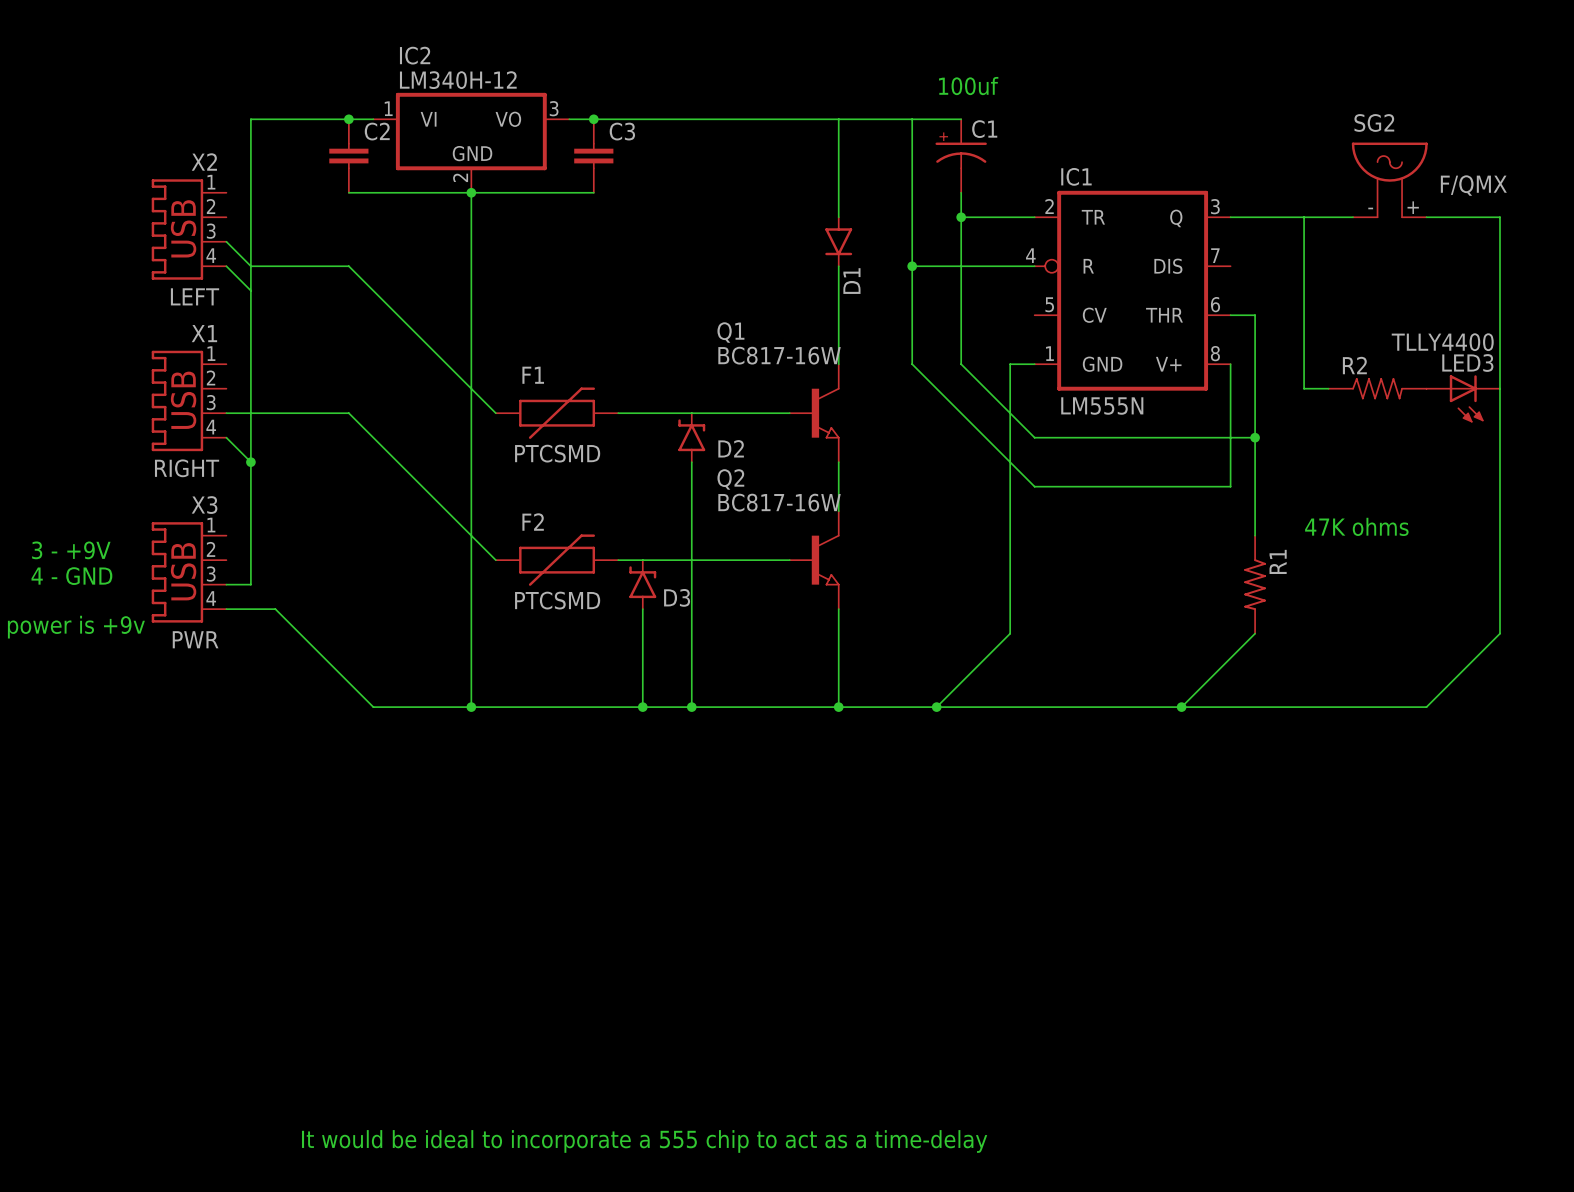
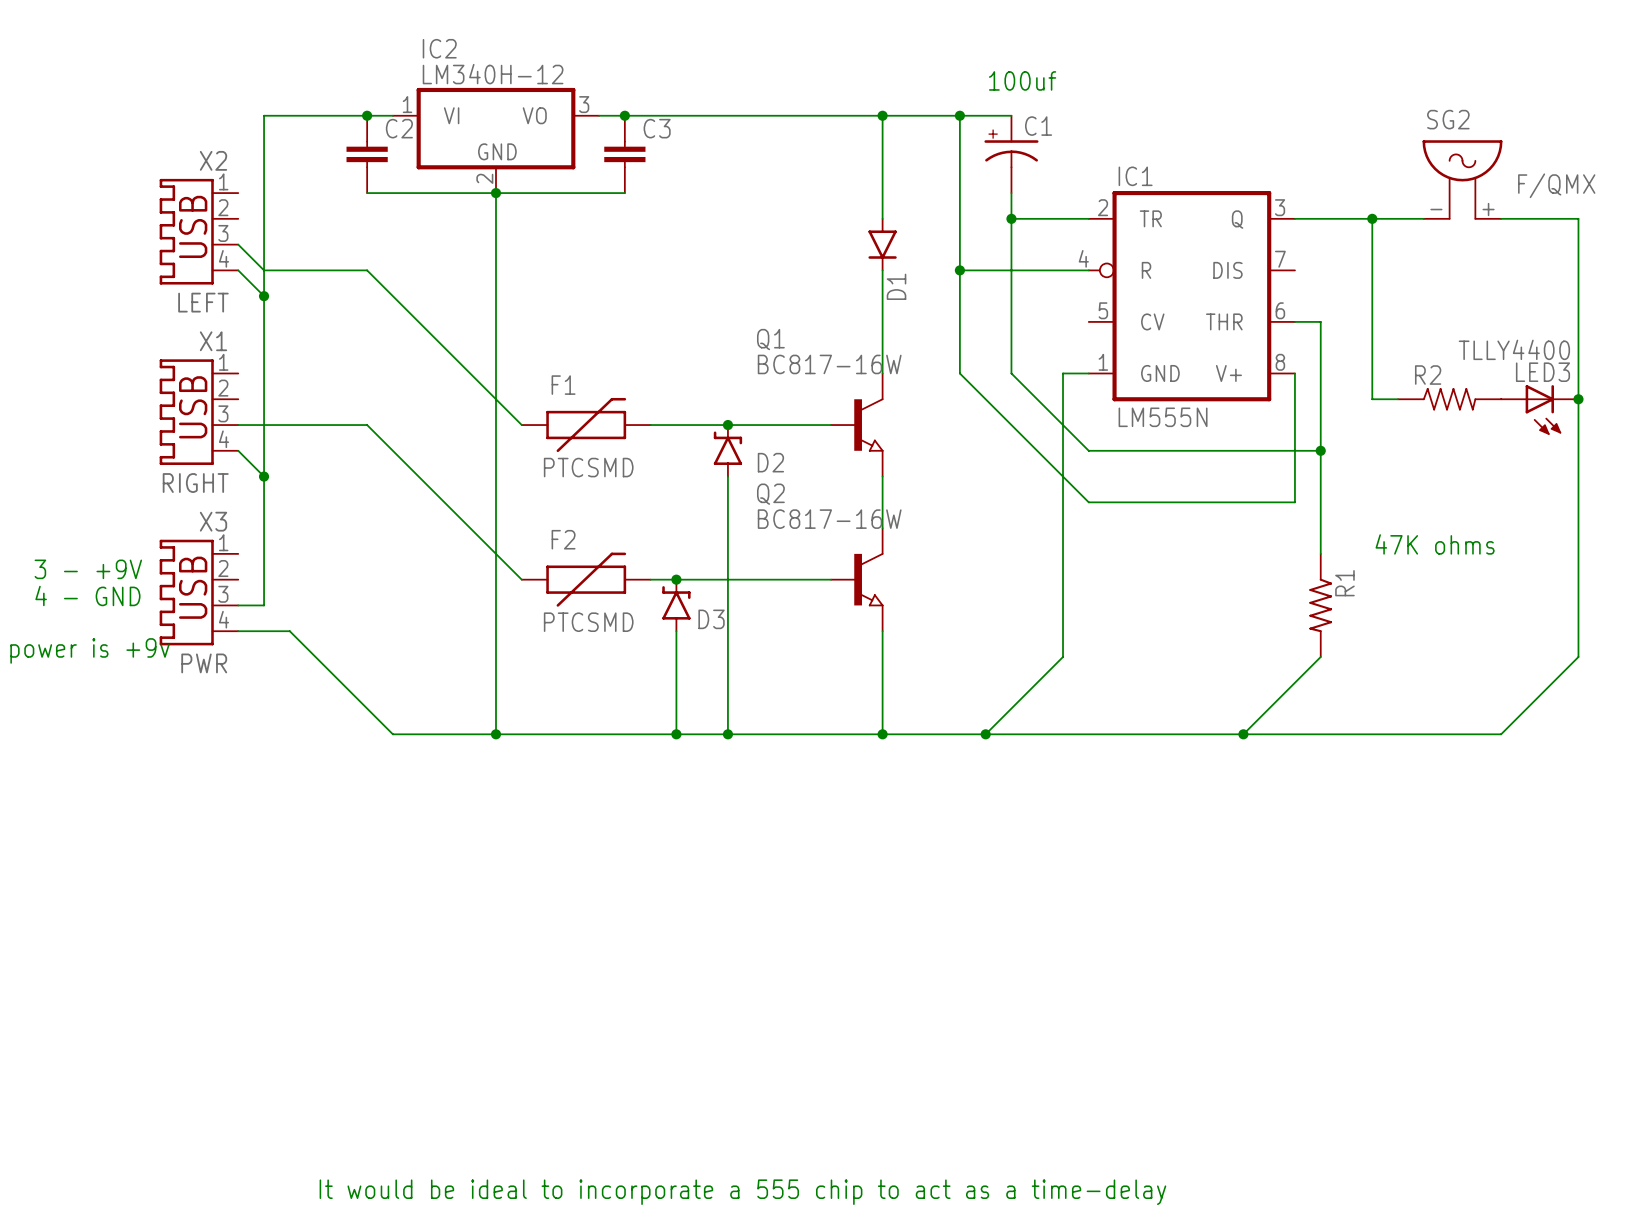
junction: none -> (882, 115)
junction: none -> (959, 115)
junction: none -> (1372, 218)
junction: none -> (264, 296)
junction: none -> (1578, 399)
junction: none -> (727, 425)
junction: none -> (676, 579)

